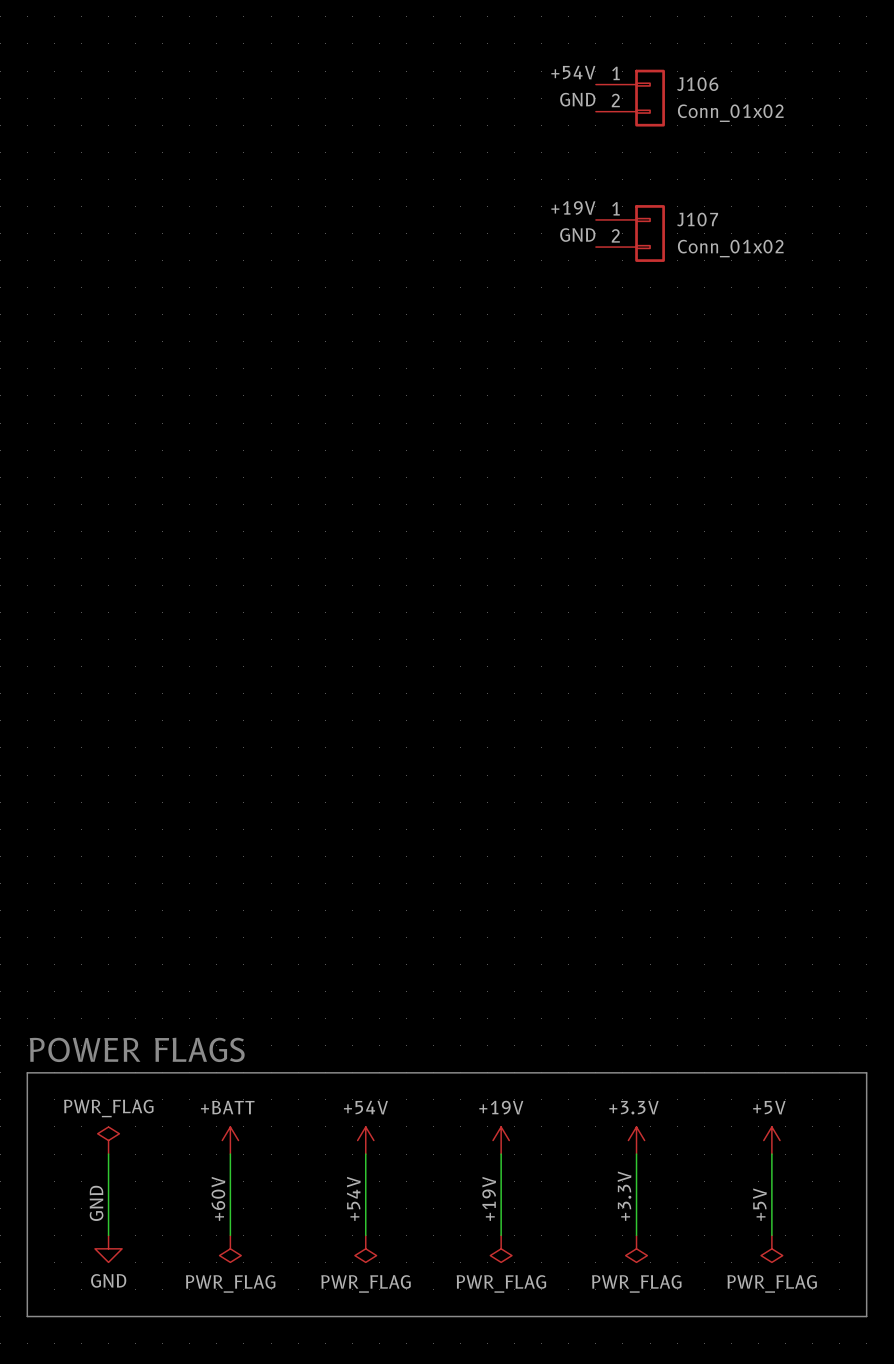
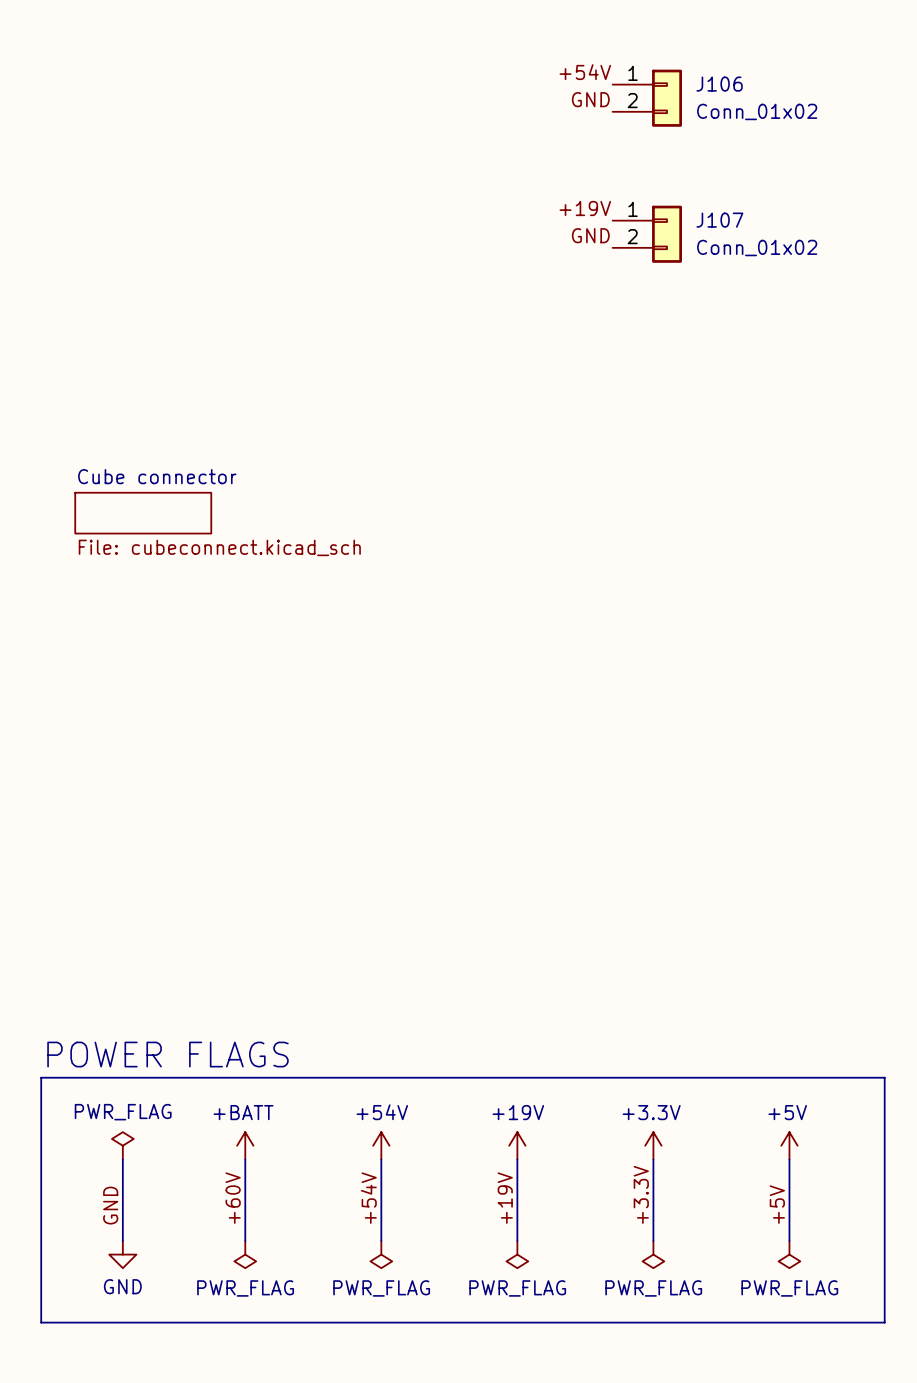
sheet Cube connector: none -> File: cubeconnect.kicad_sch (143, 513)

